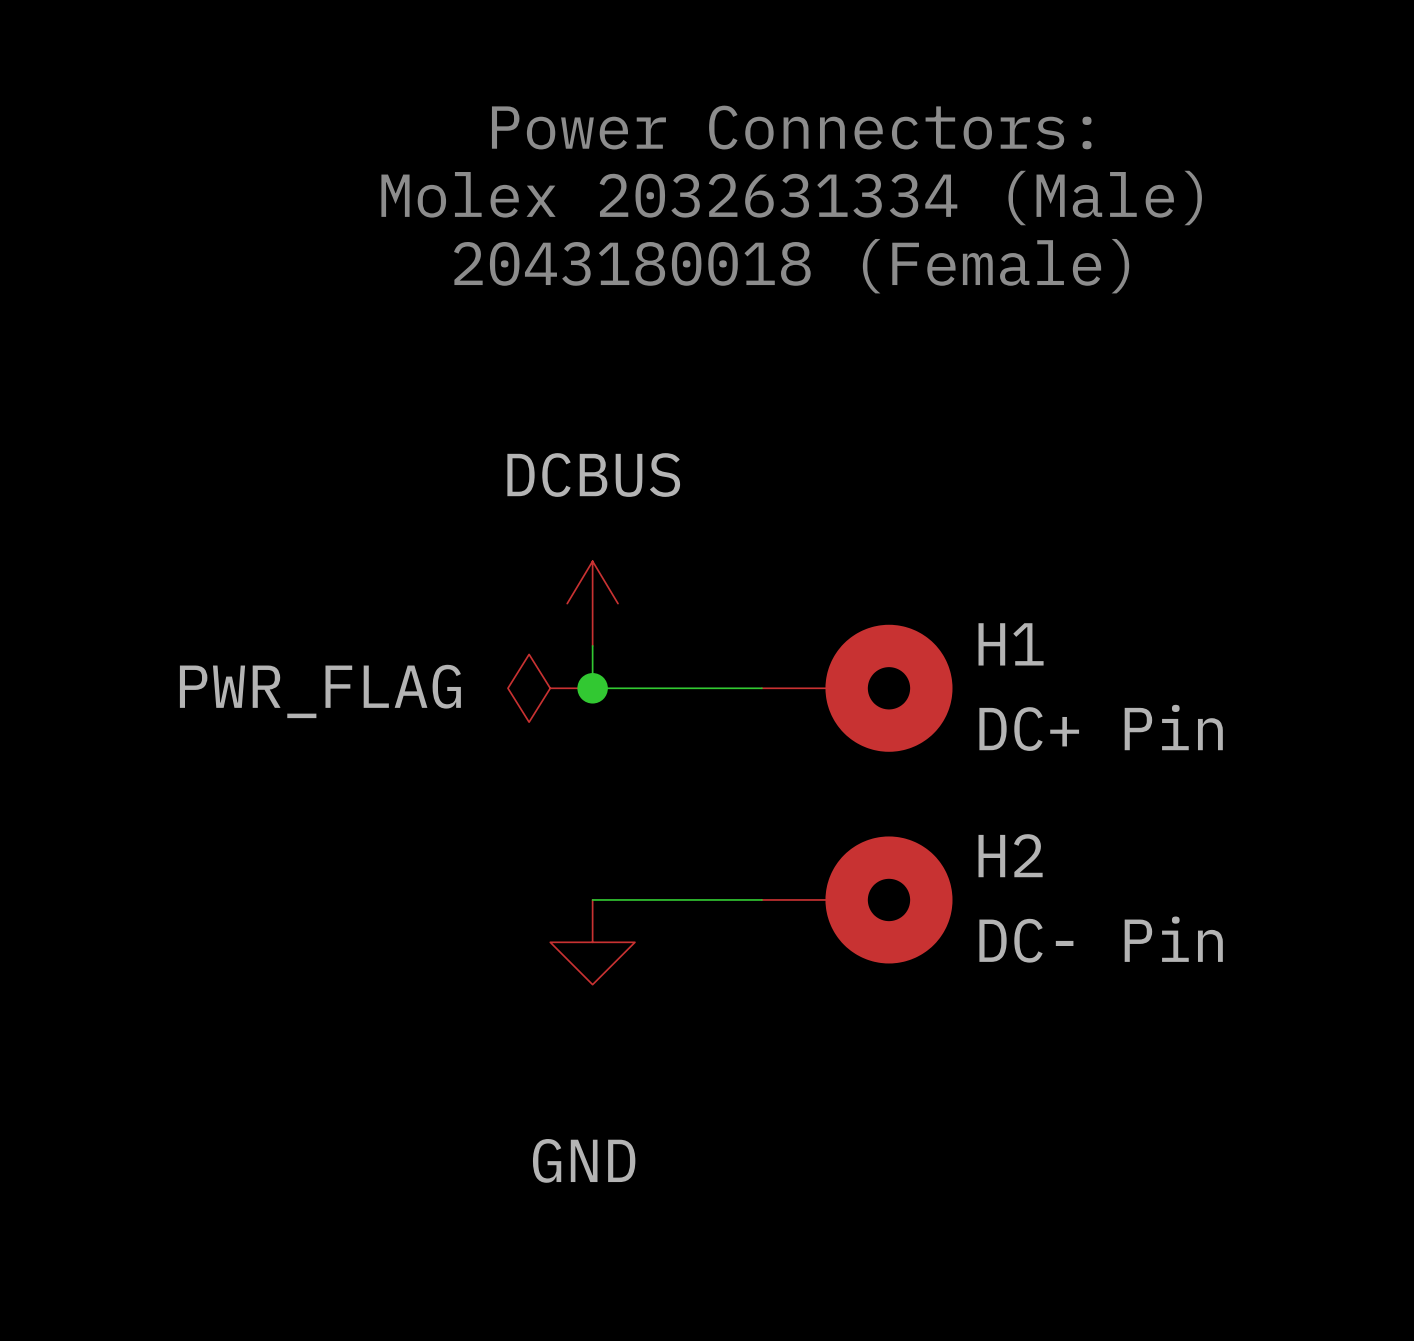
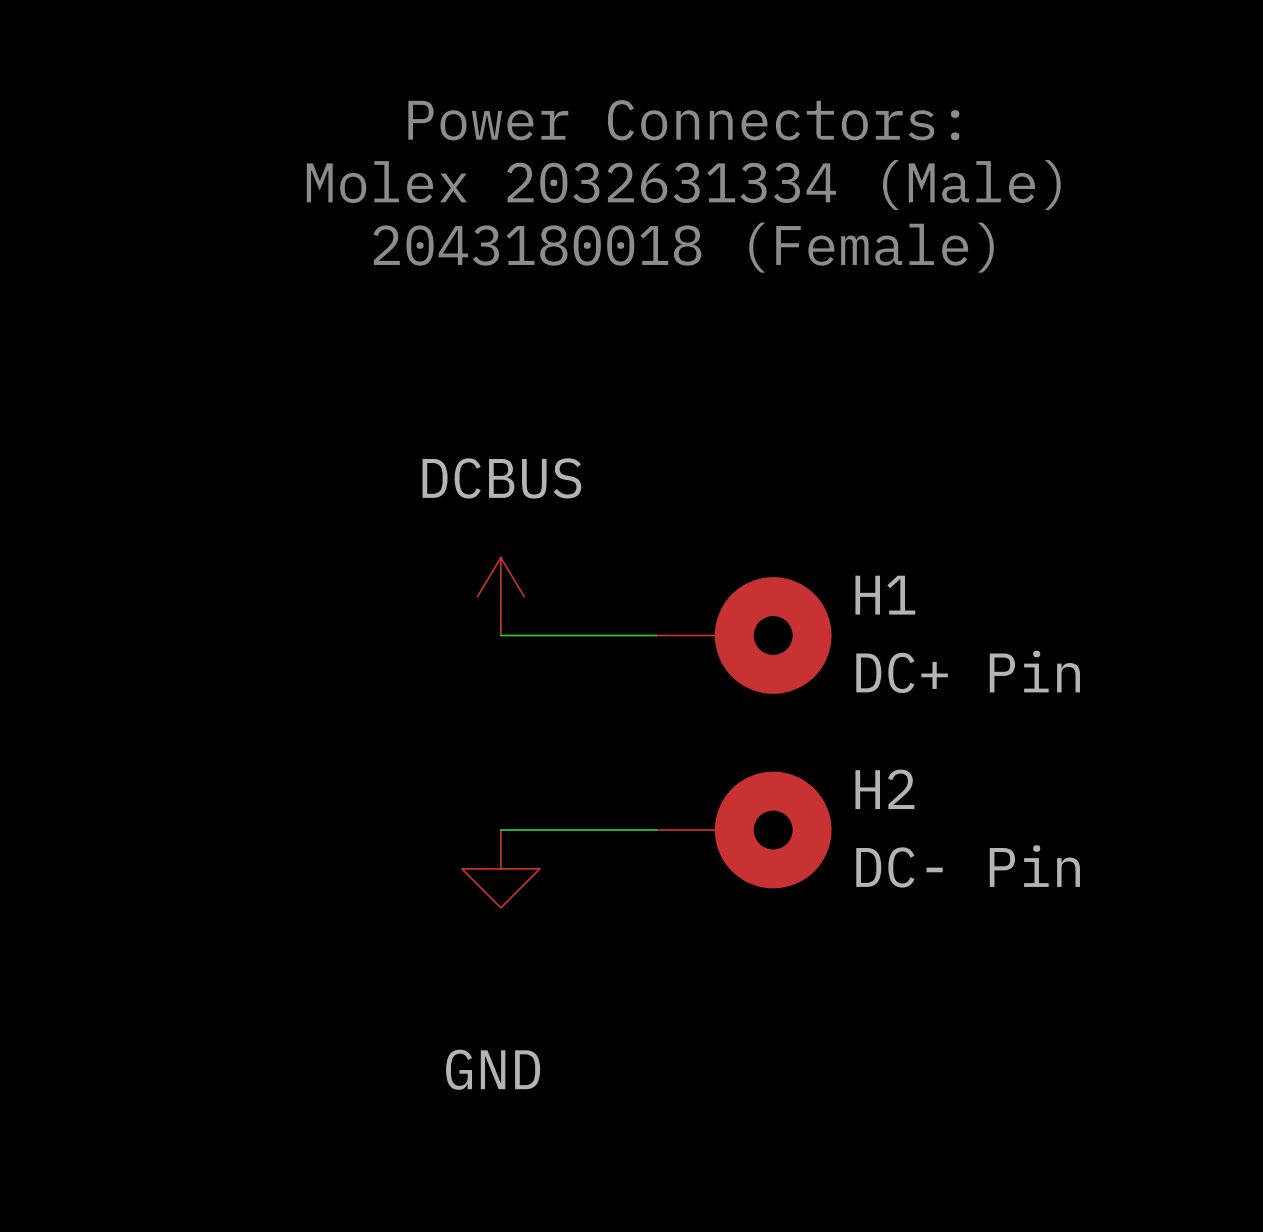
power symbol position: DCBUS (592, 603) -> DCBUS (500, 596)
power symbol: PWR_FLAG (550, 688) -> none
junction: (592, 688) -> none

